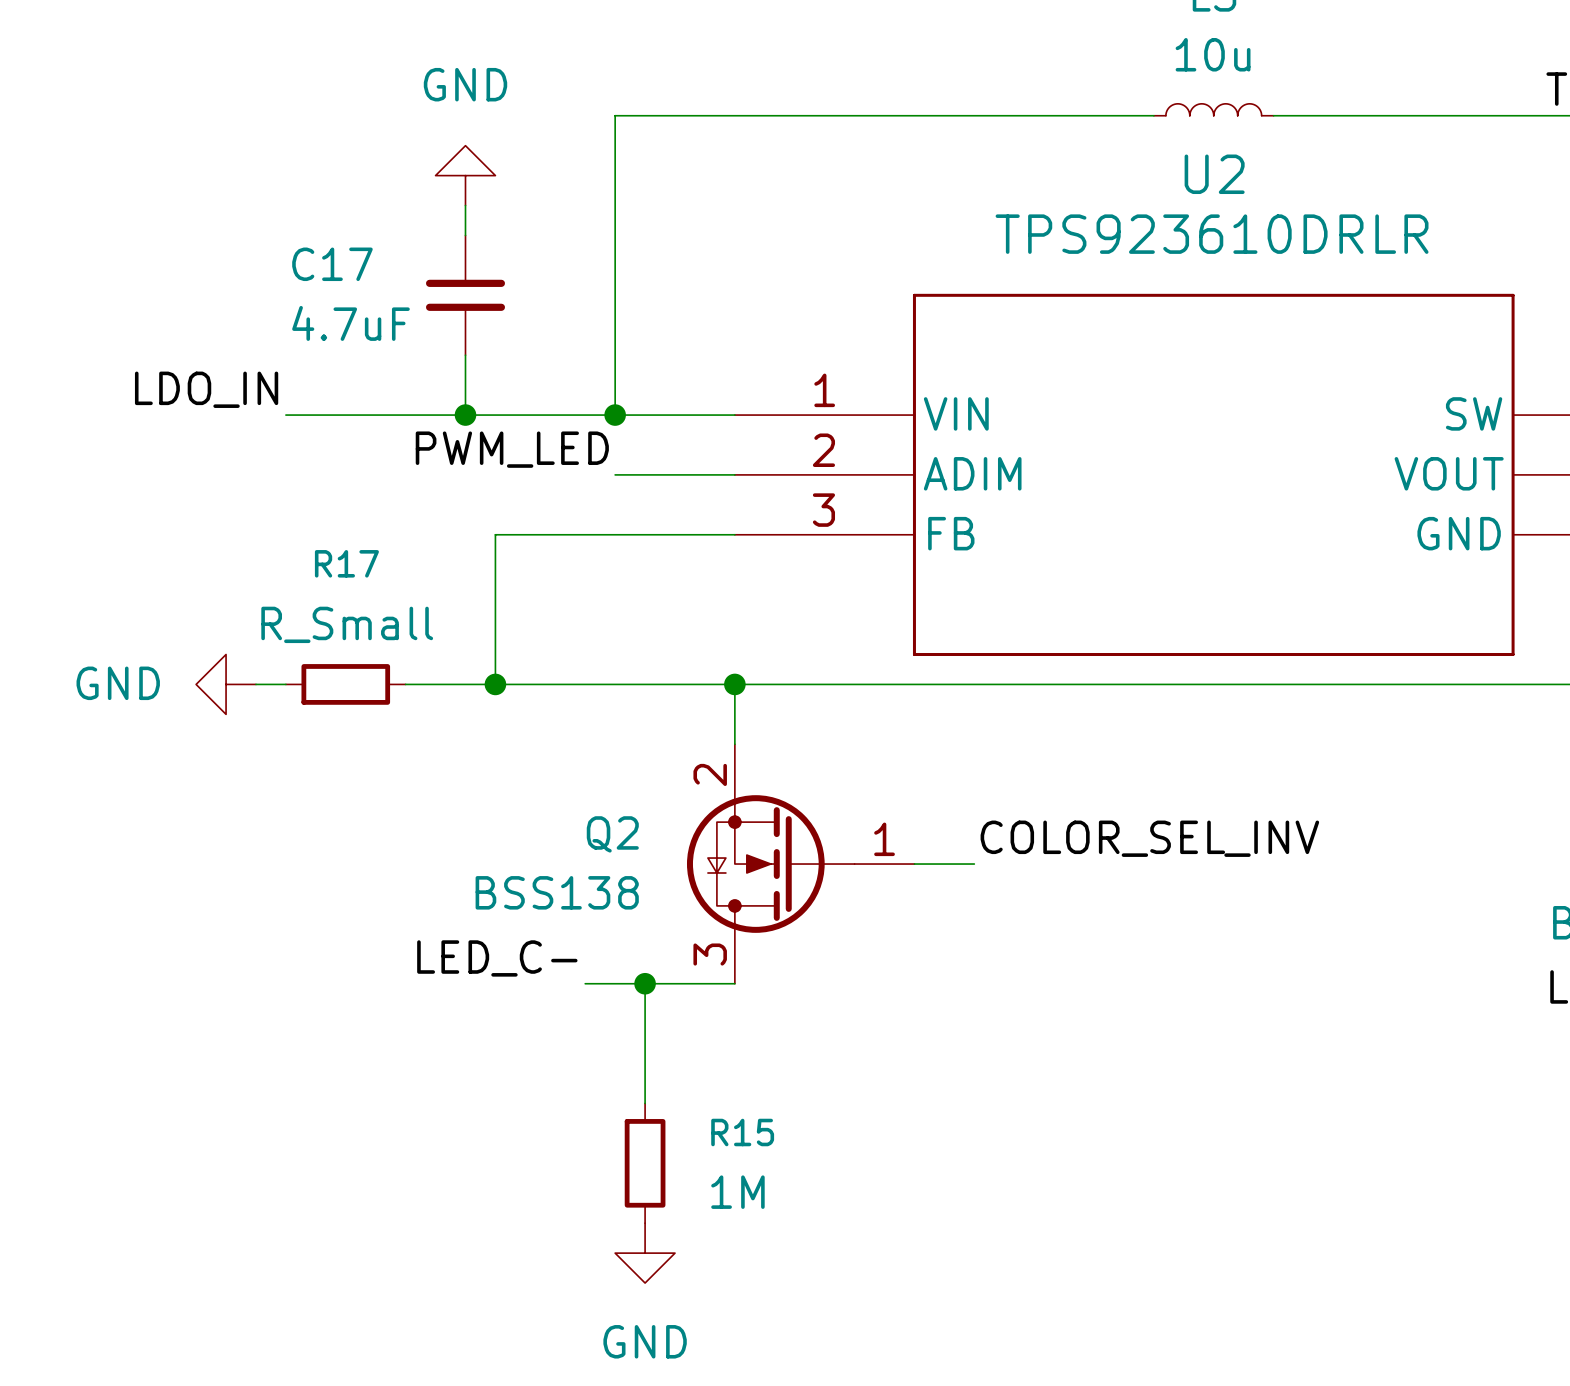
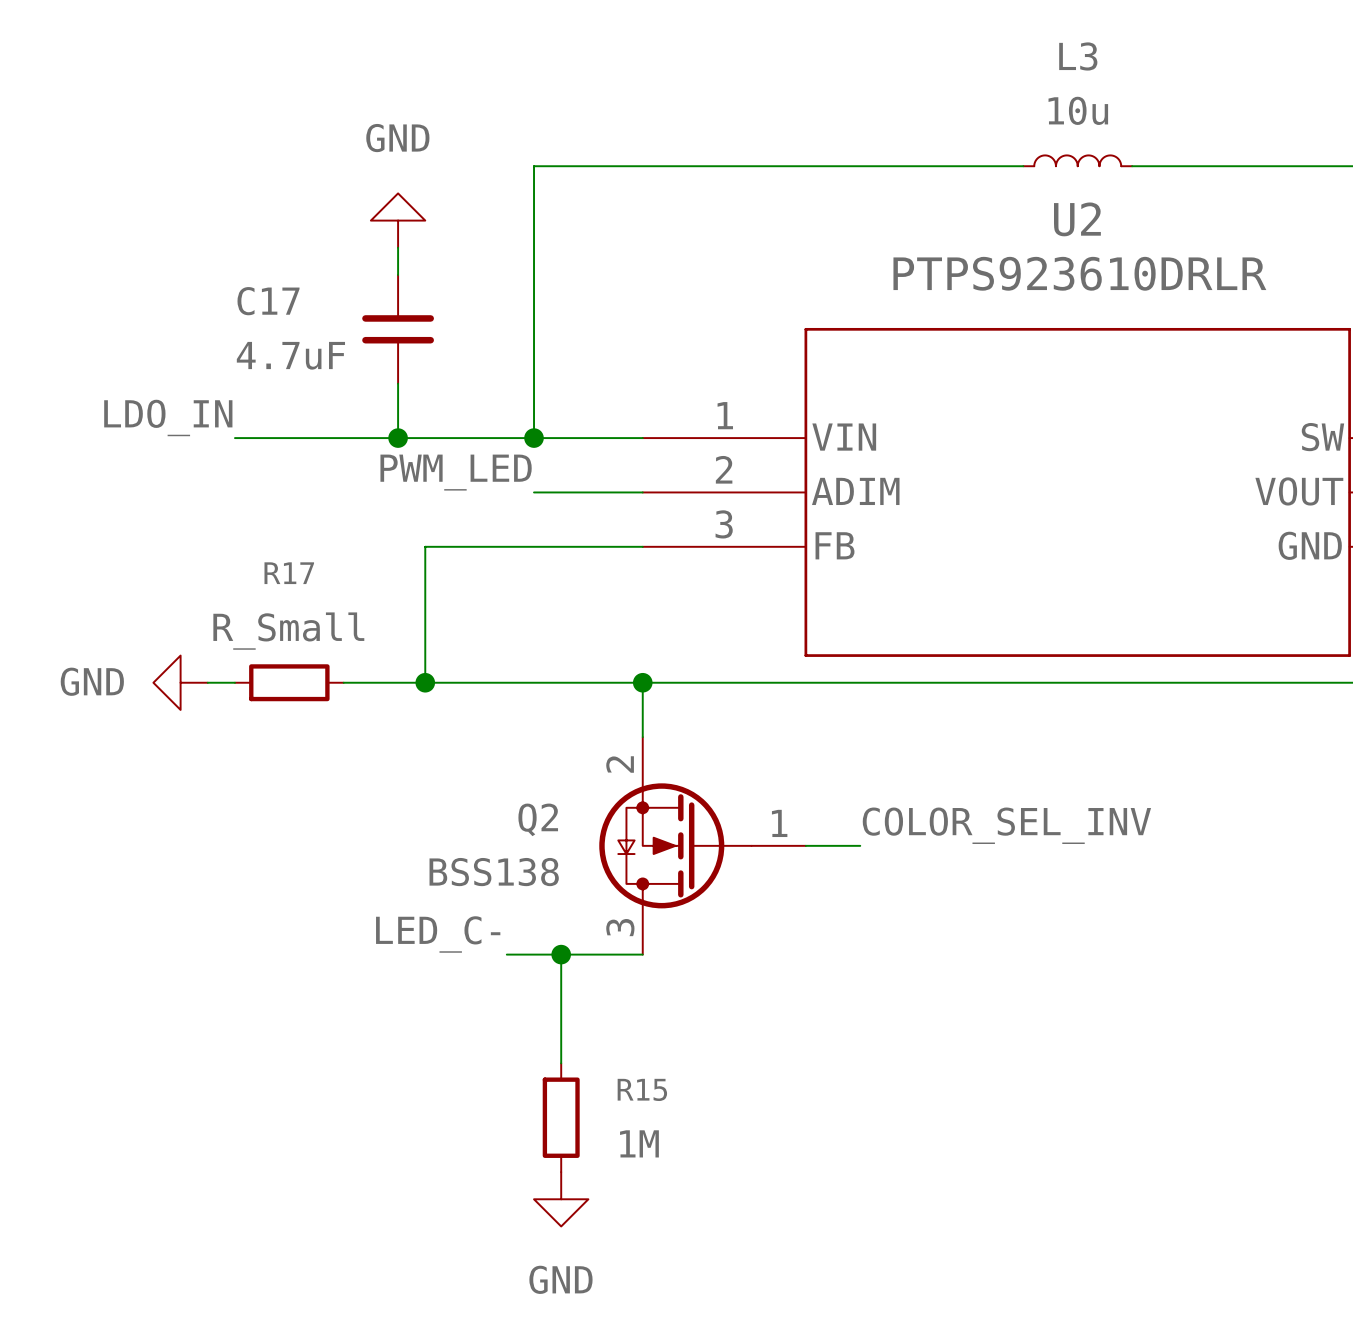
U2 value: TPS923610DRLR (1212, 234) -> PTPS923610DRLR (1079, 273)

